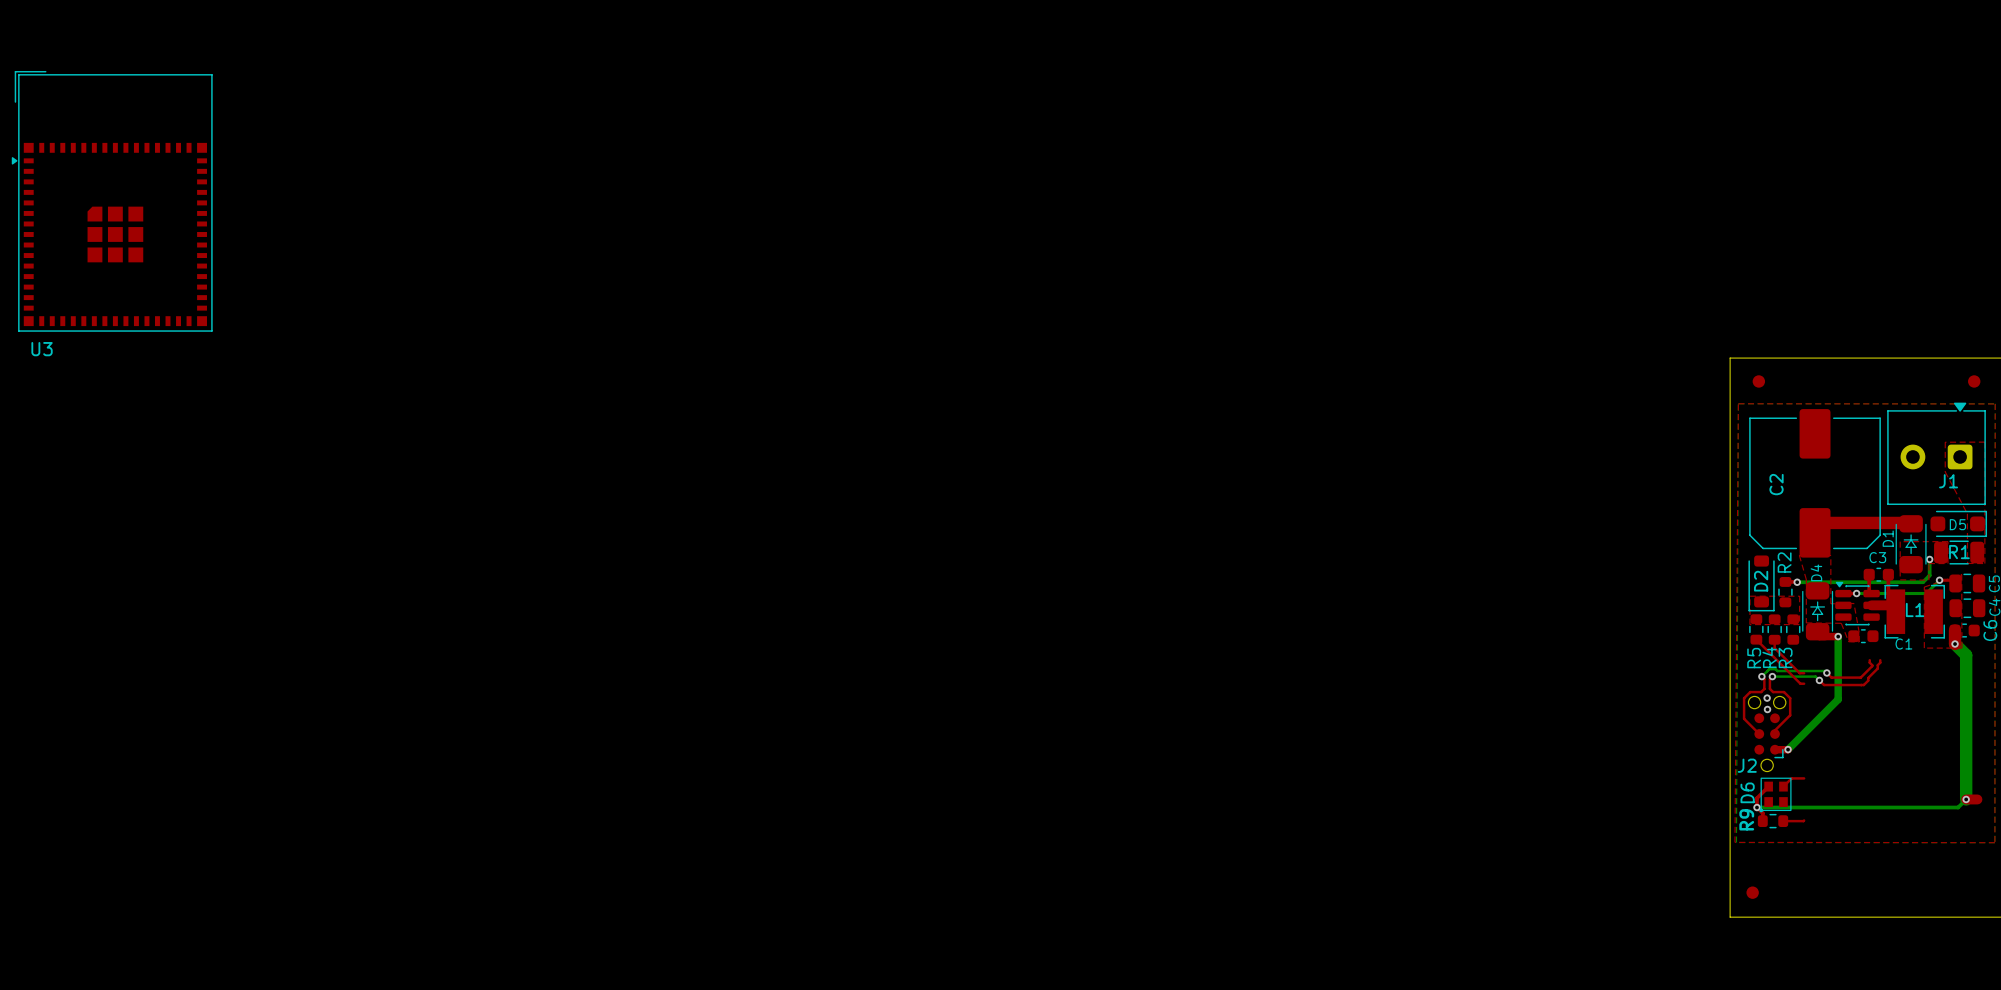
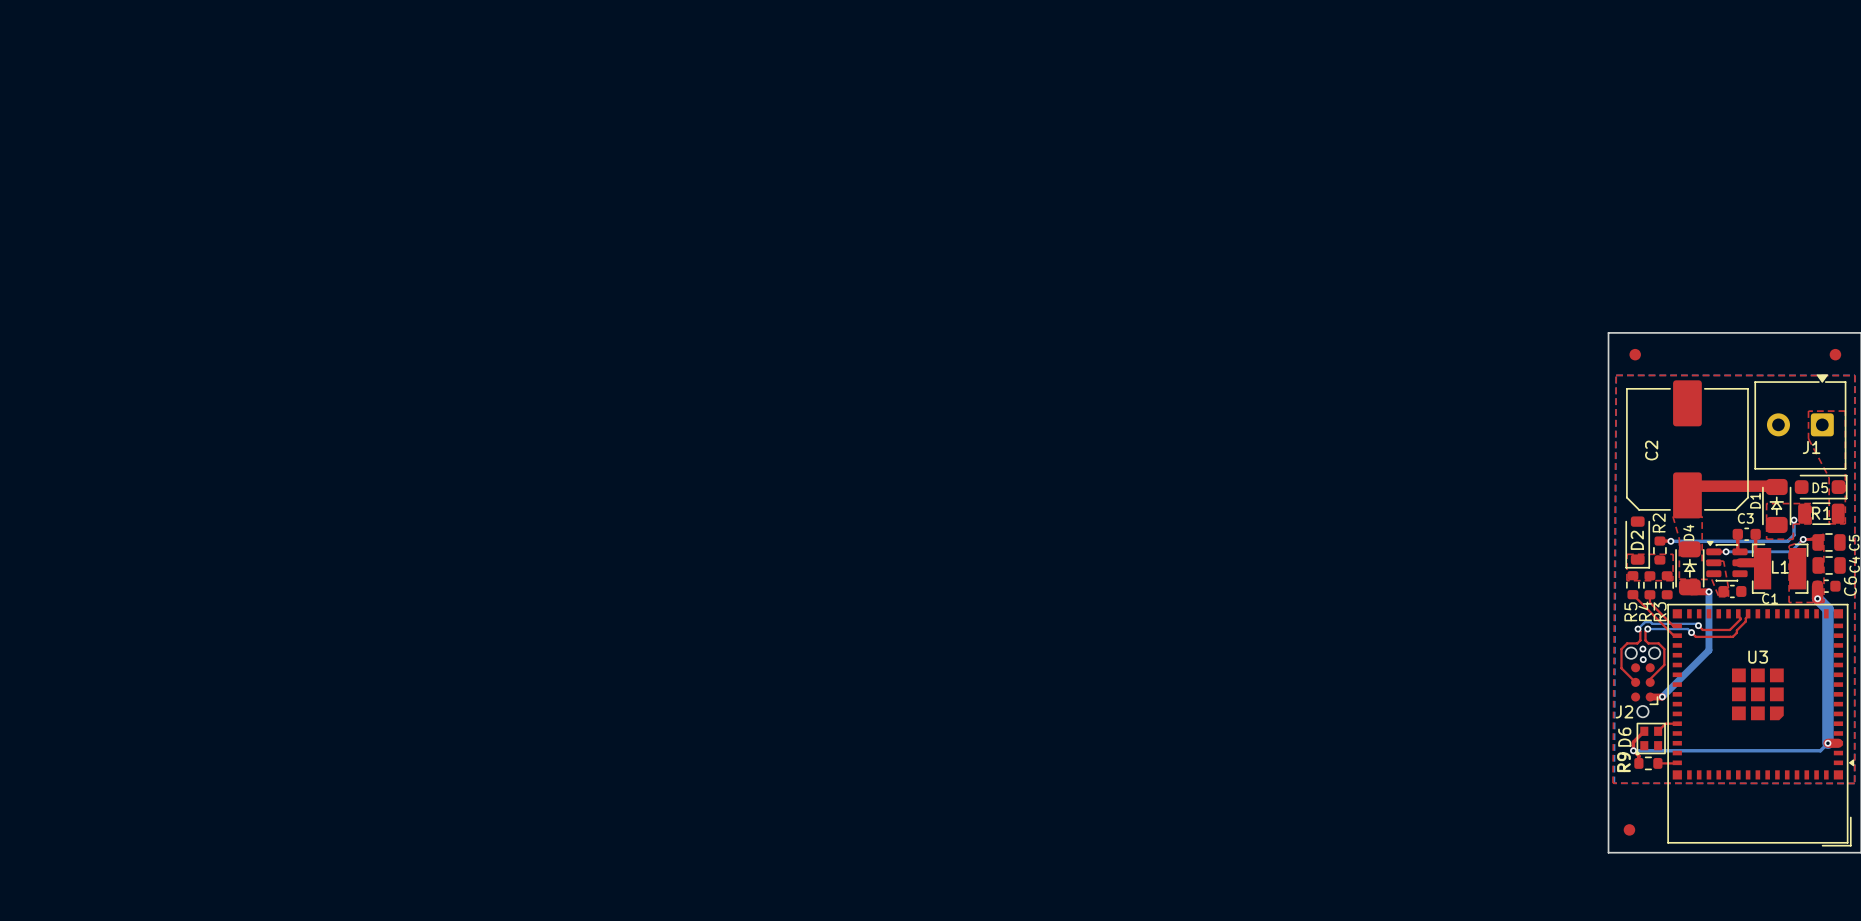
U3 rotation: 0° (112, 201) -> 180° (1760, 725)
U3 position: (112, 201) -> (1760, 725)
U3 name position: U3 (42, 349) -> U3 (1758, 657)

